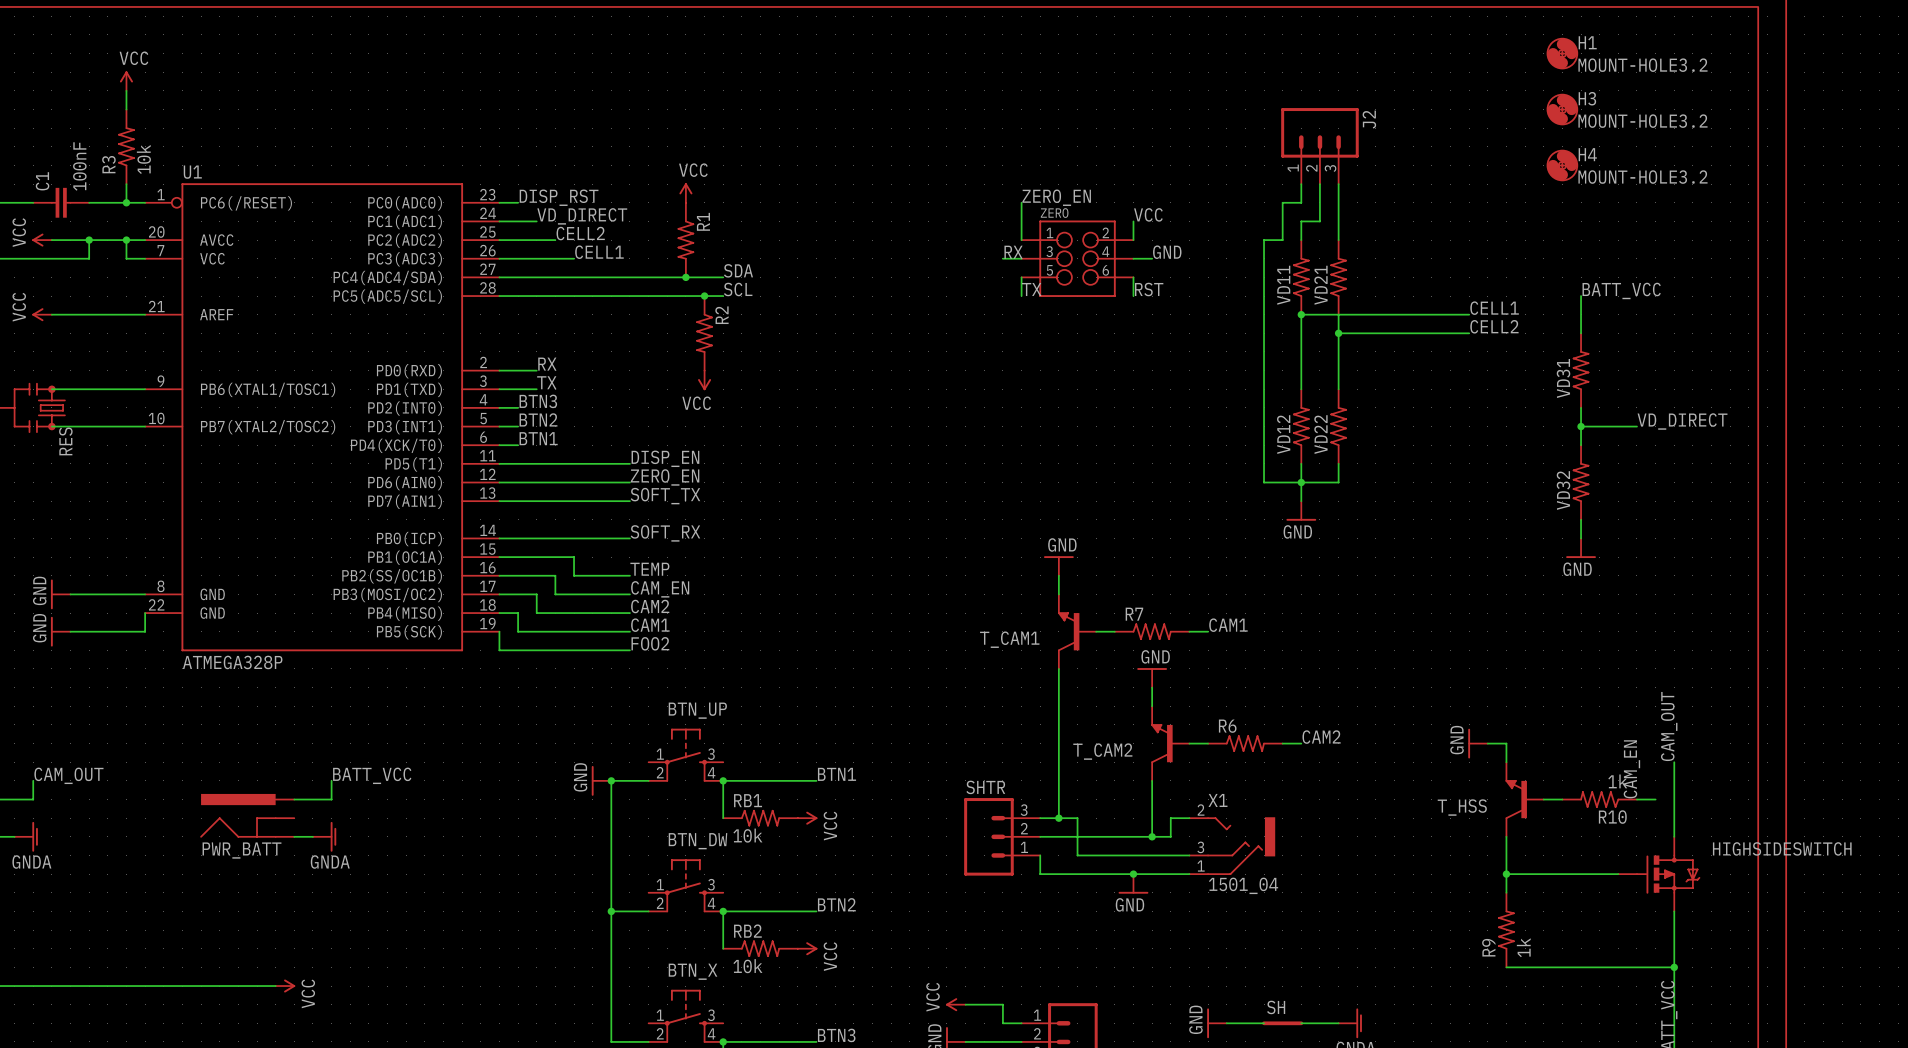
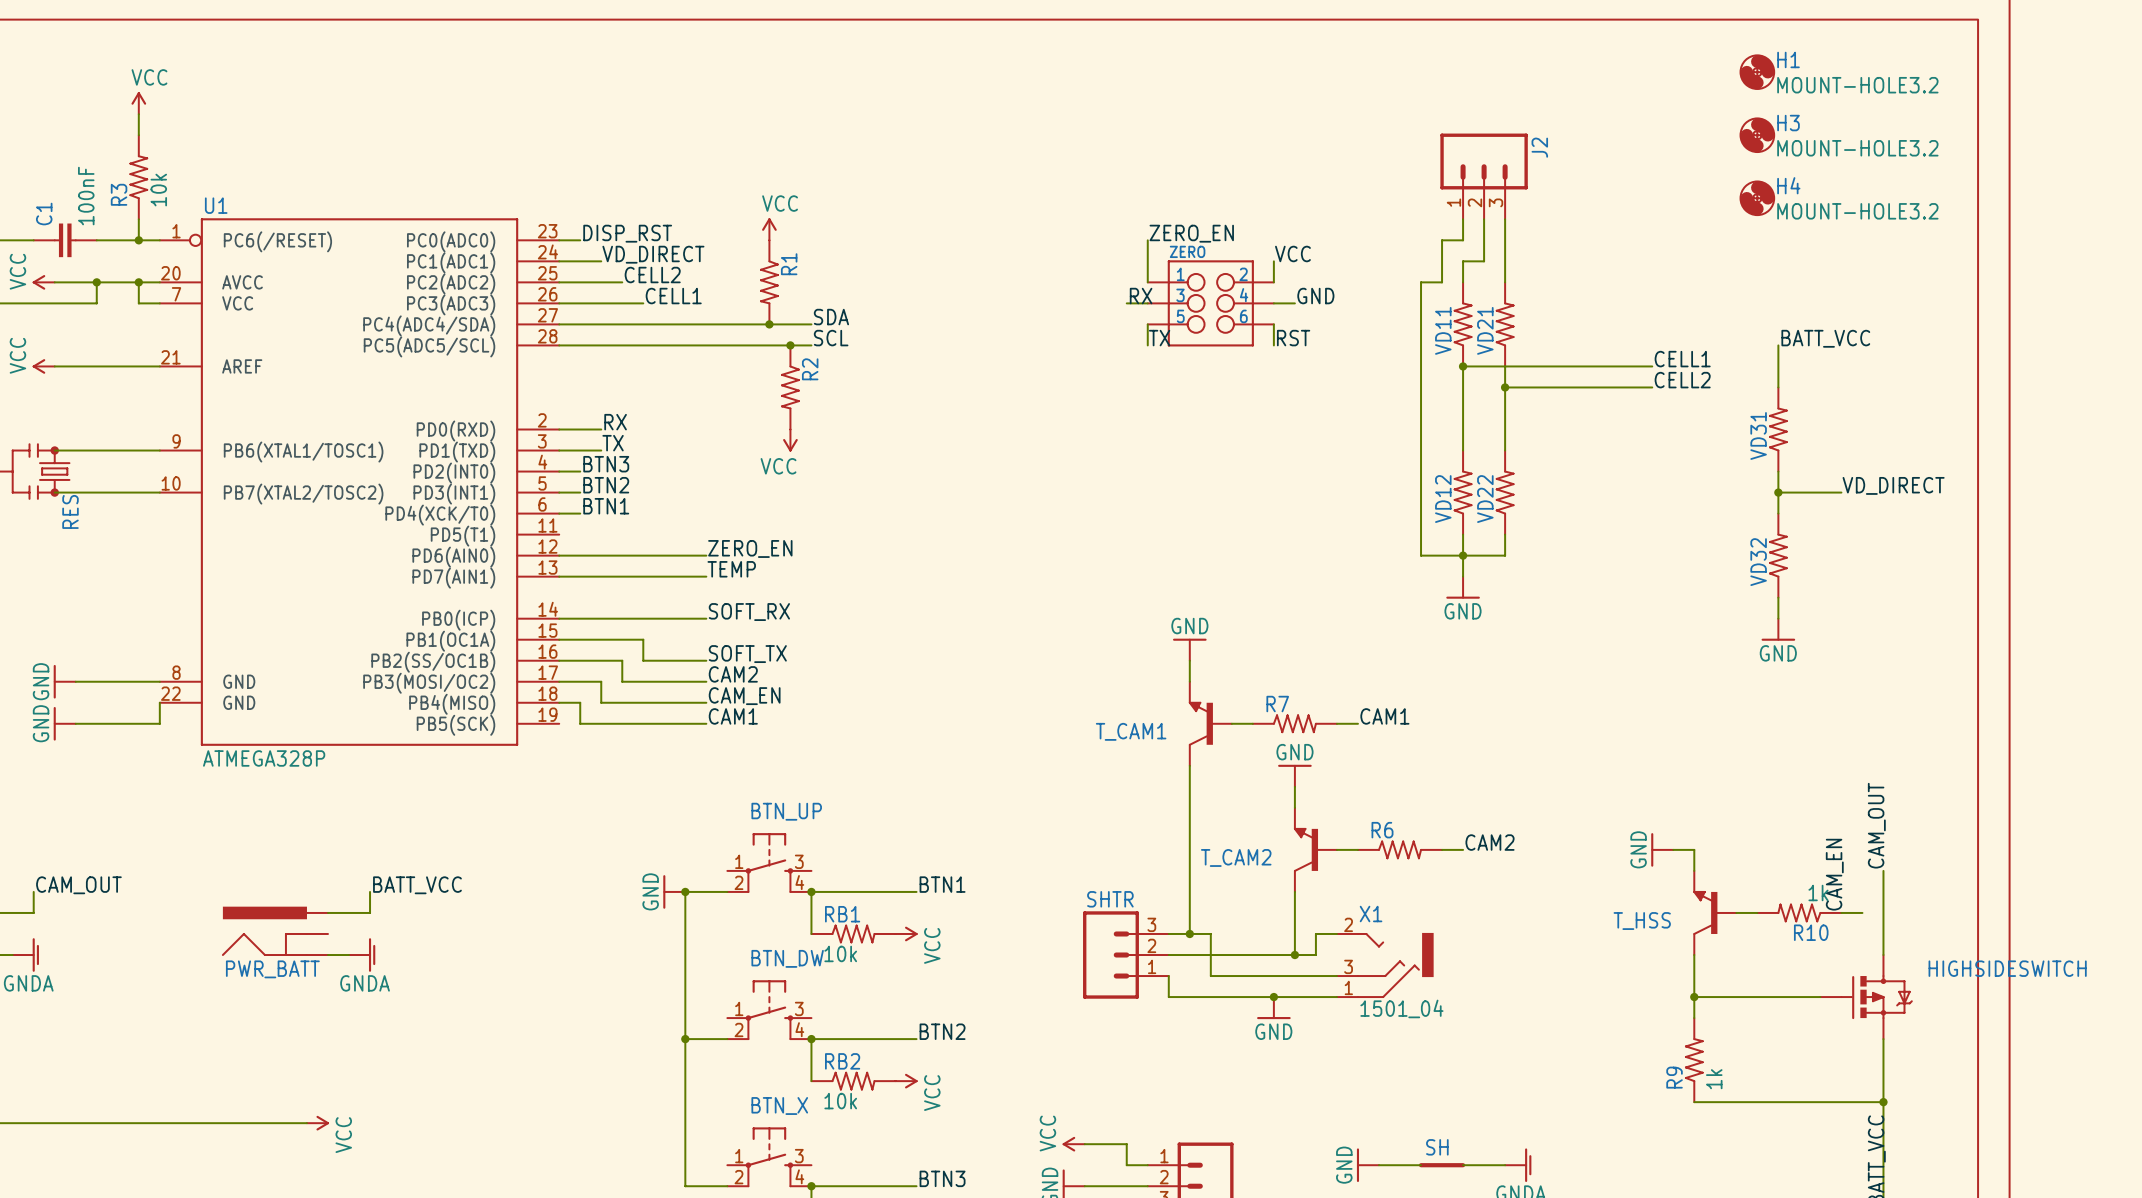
label: DISP_EN (665, 458) -> none
wire: (499, 463) (629, 463) -> none
label: SOFT_TX (665, 496) -> TEMP (731, 569)
label: TEMP (649, 569) -> SOFT_TX (747, 654)
label: CAM_EN (660, 589) -> CAM2 (733, 674)
label: CAM2 (650, 606) -> CAM_EN (744, 696)
wire: (499, 631) (499, 650) (629, 650) -> none
label: FOO2 (650, 643) -> none

